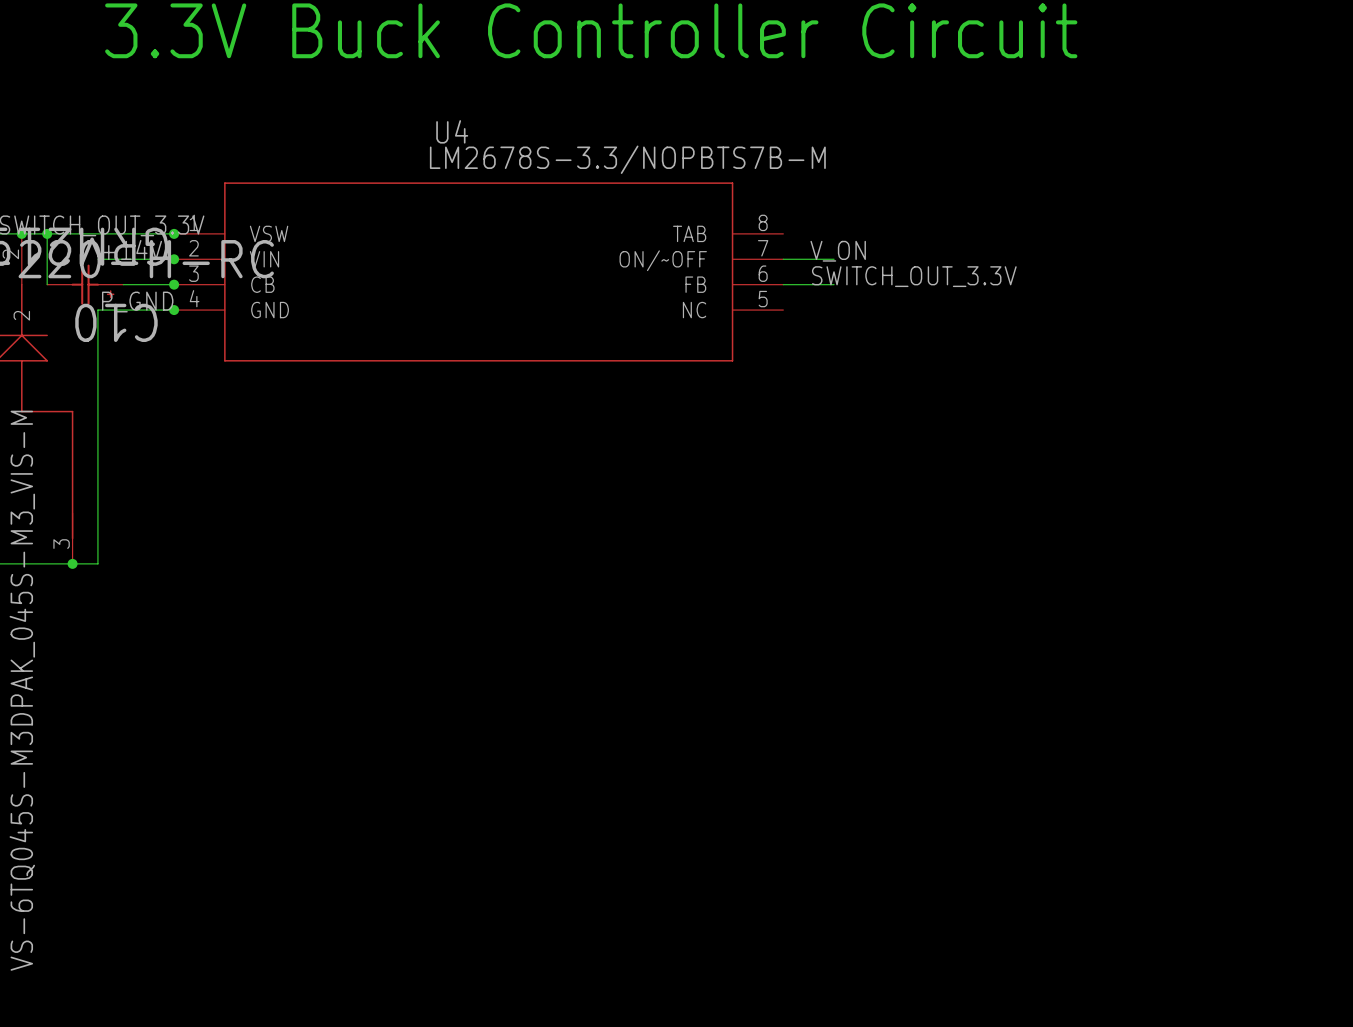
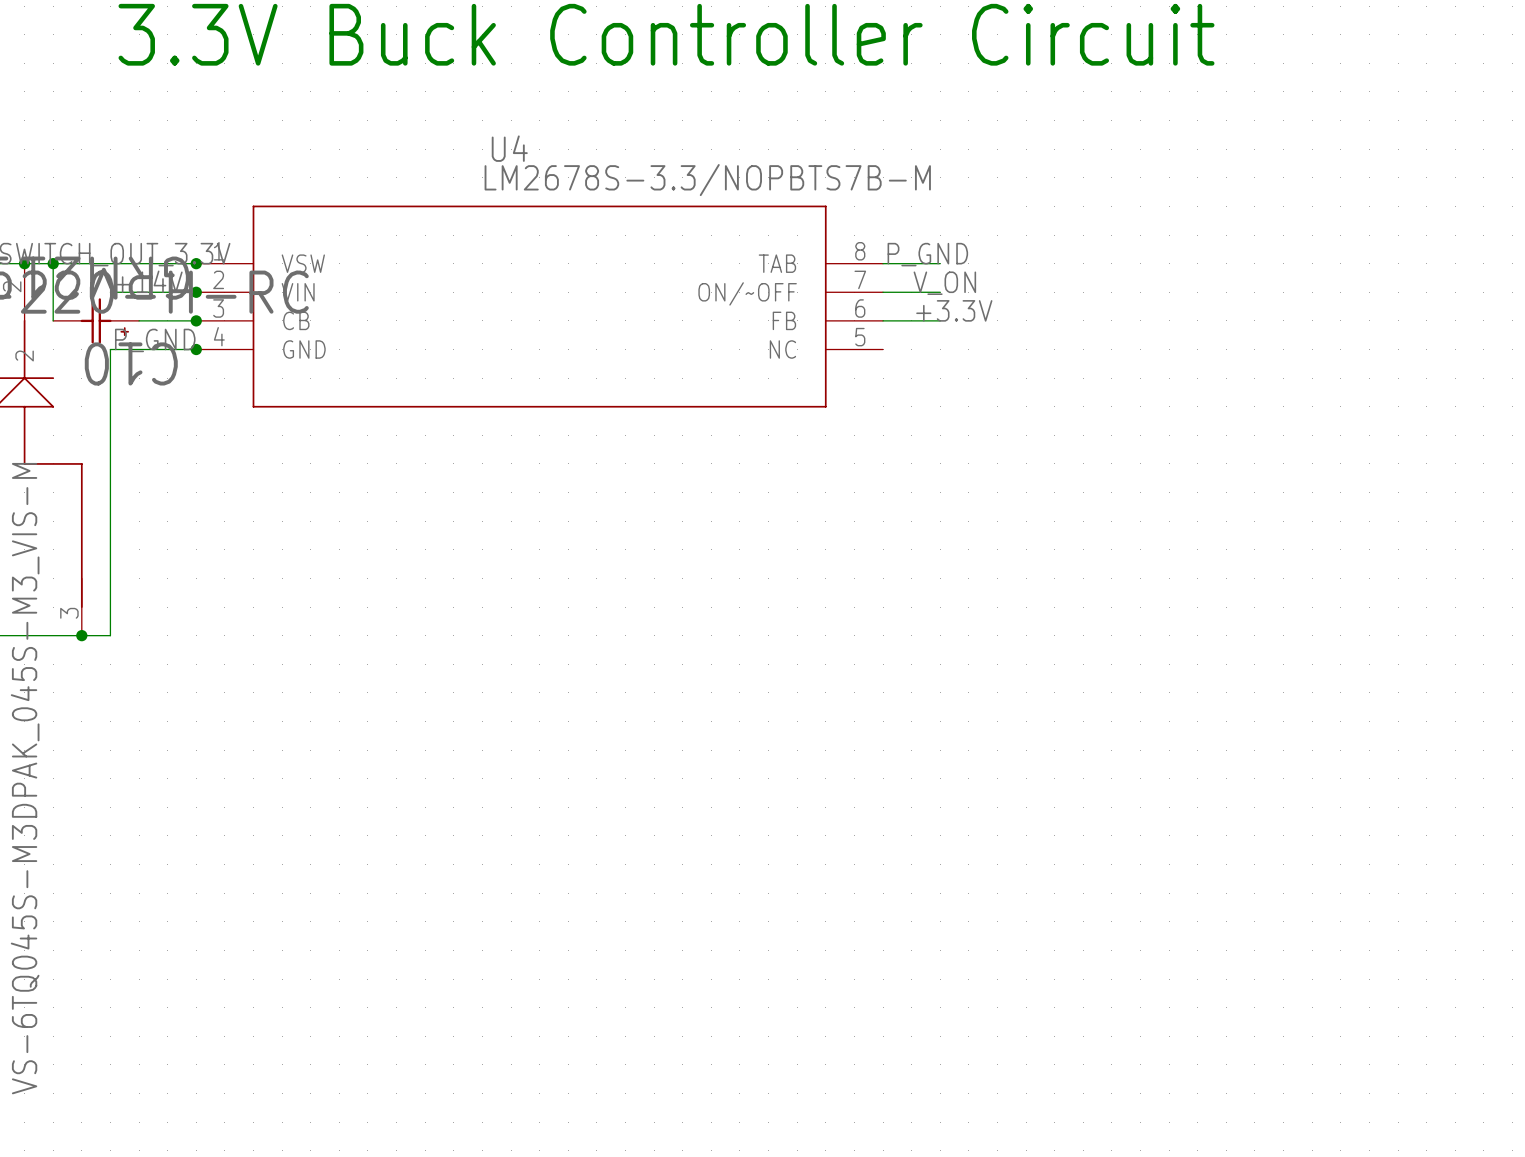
label: none -> P_GND (927, 254)
wire: none -> (883, 263) (940, 263)
label: SWITCH_OUT_3.3V (914, 276) -> +3.3V (954, 310)

